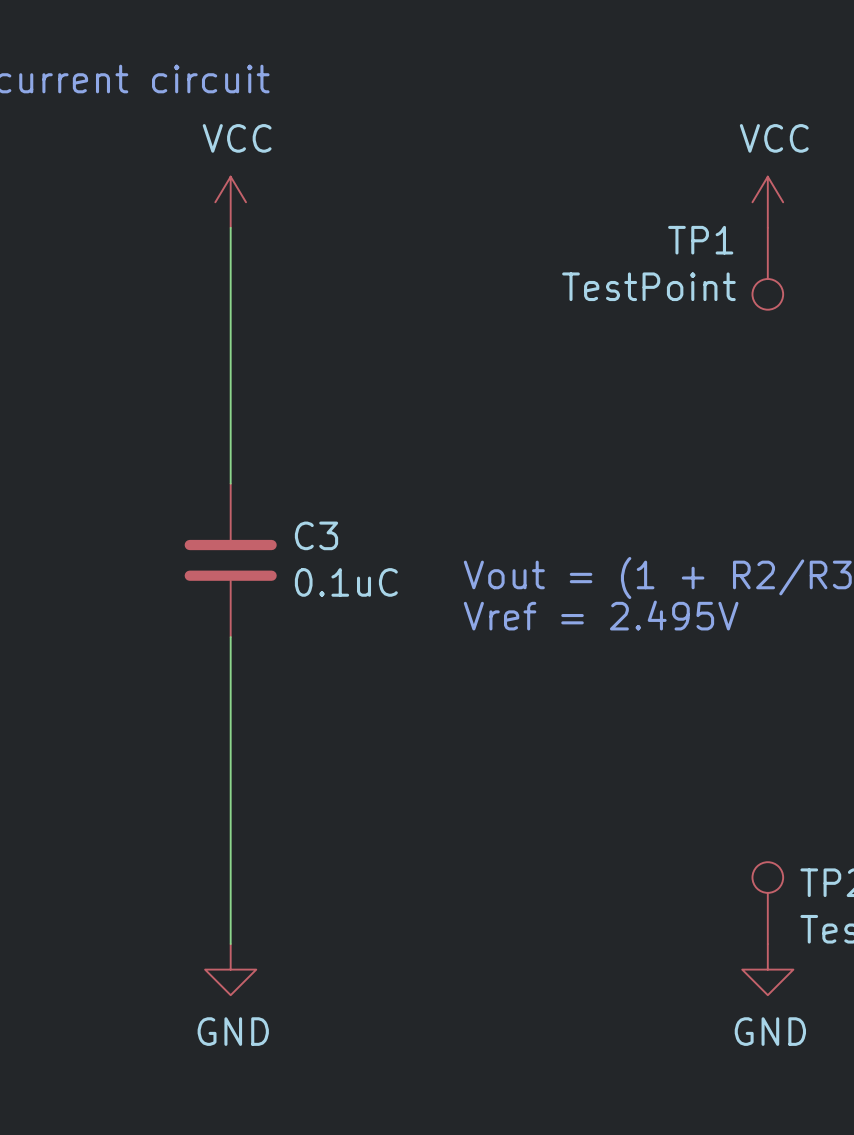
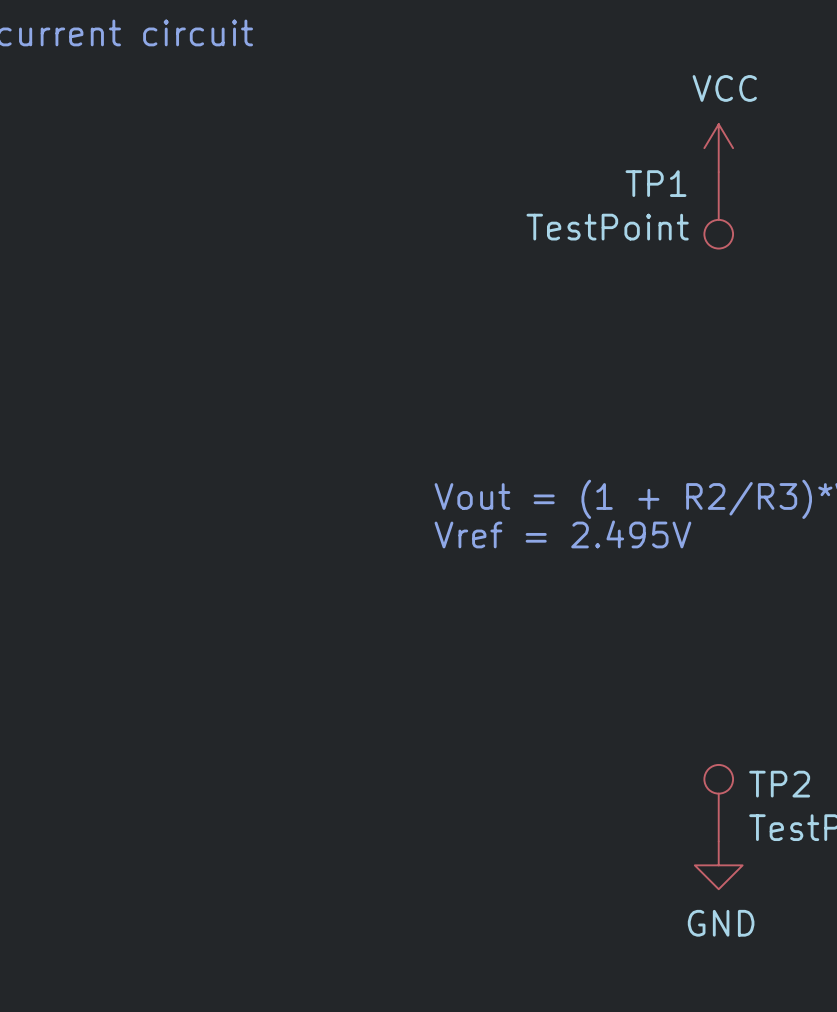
power symbol: VCC (230, 202) -> none
wire: (230, 227) (230, 483) -> none
C3: 0.1uC (230, 560) -> none
wire: (230, 637) (230, 944) -> none
power symbol: GND (230, 969) -> none

